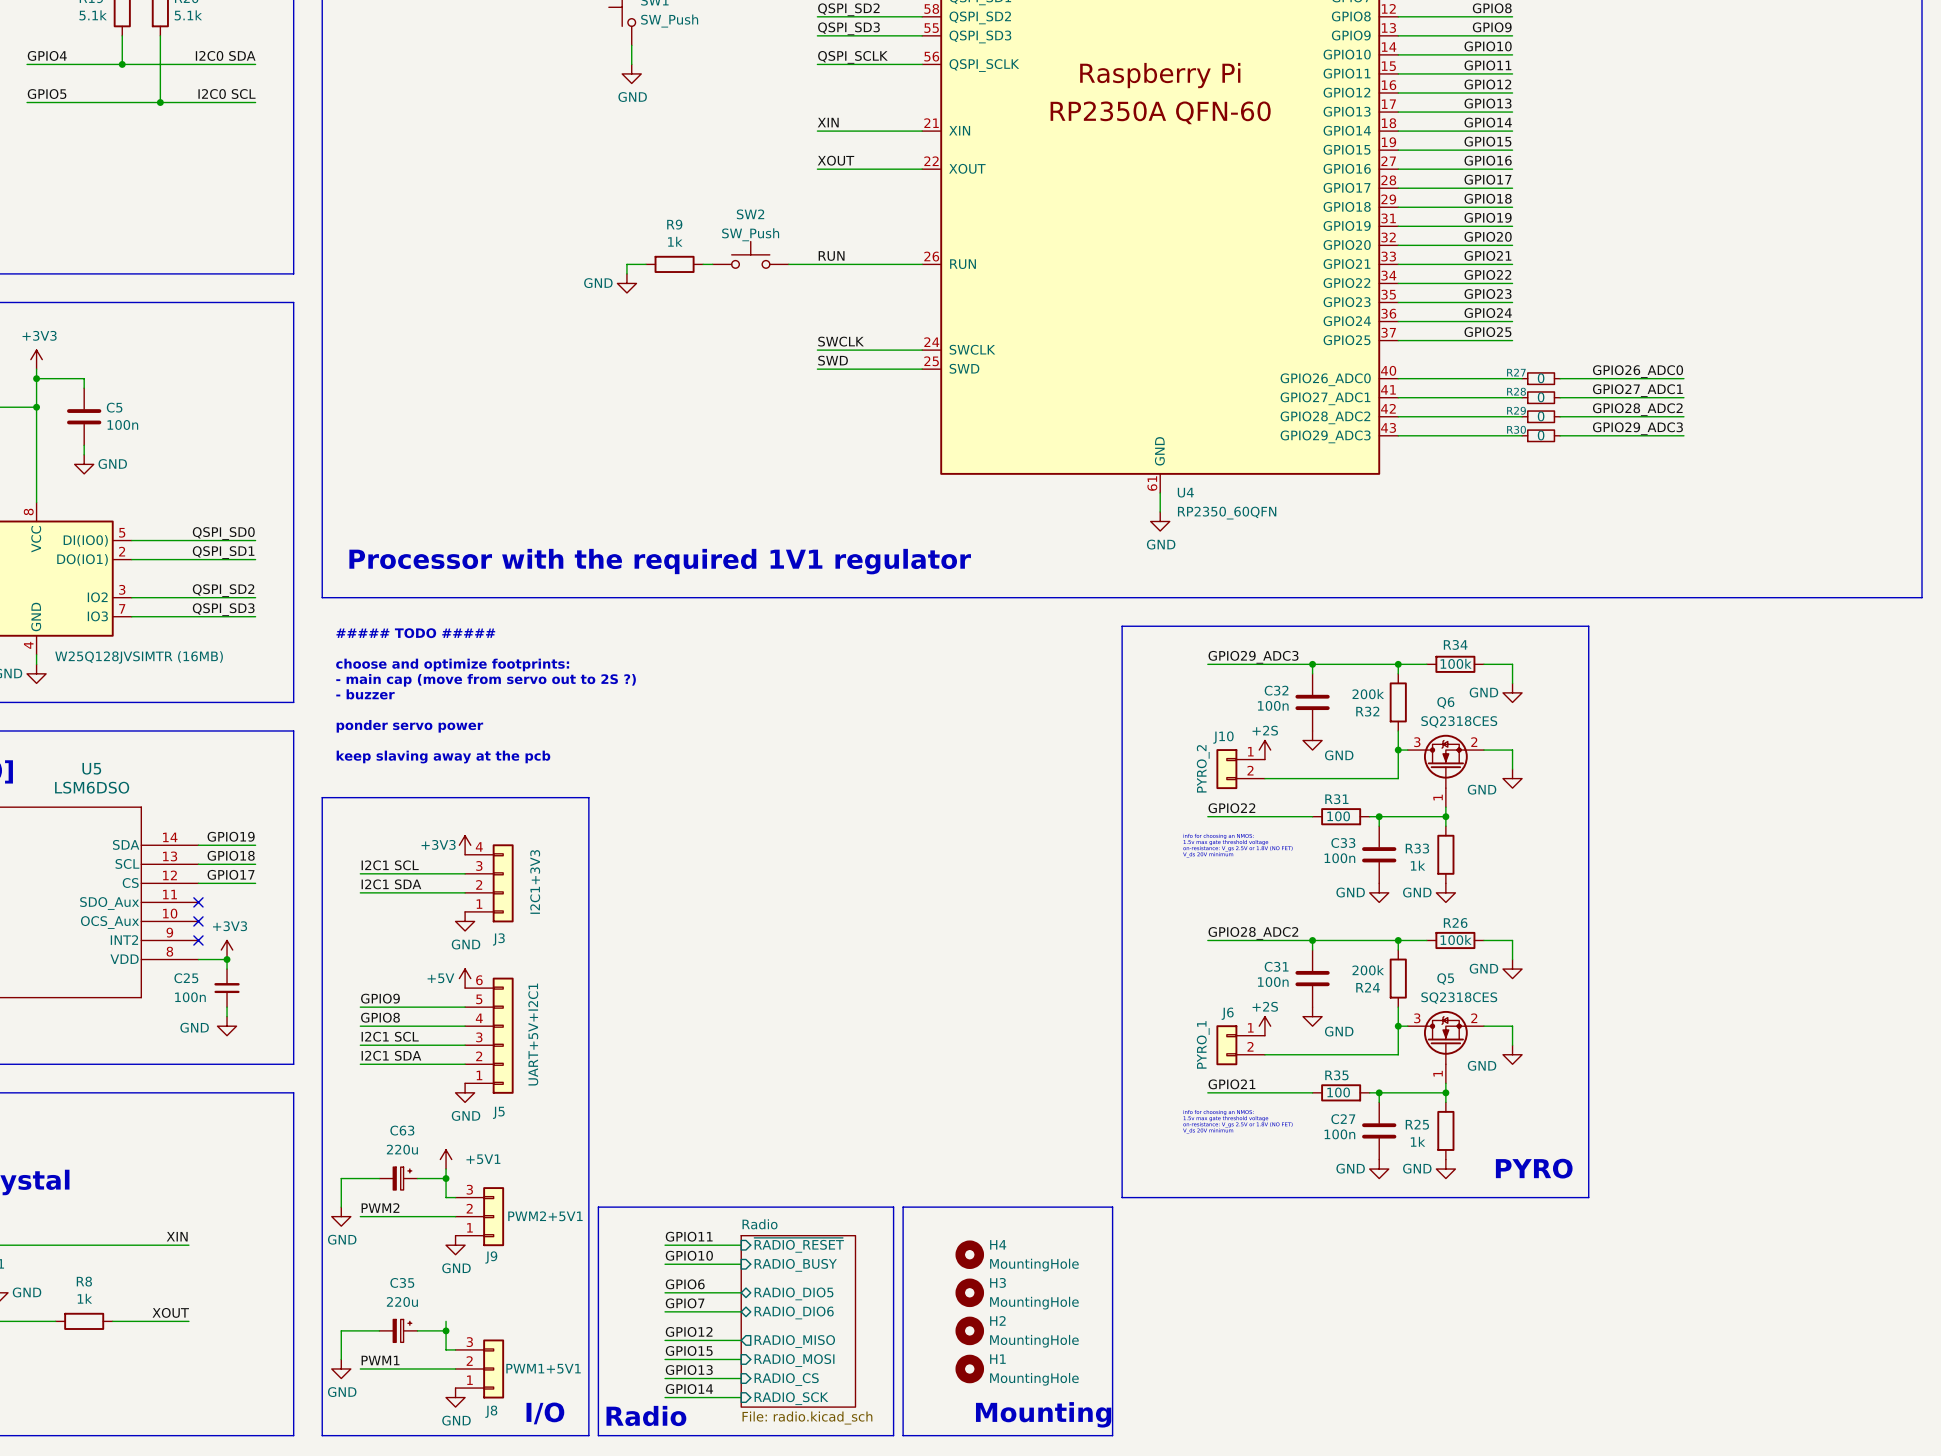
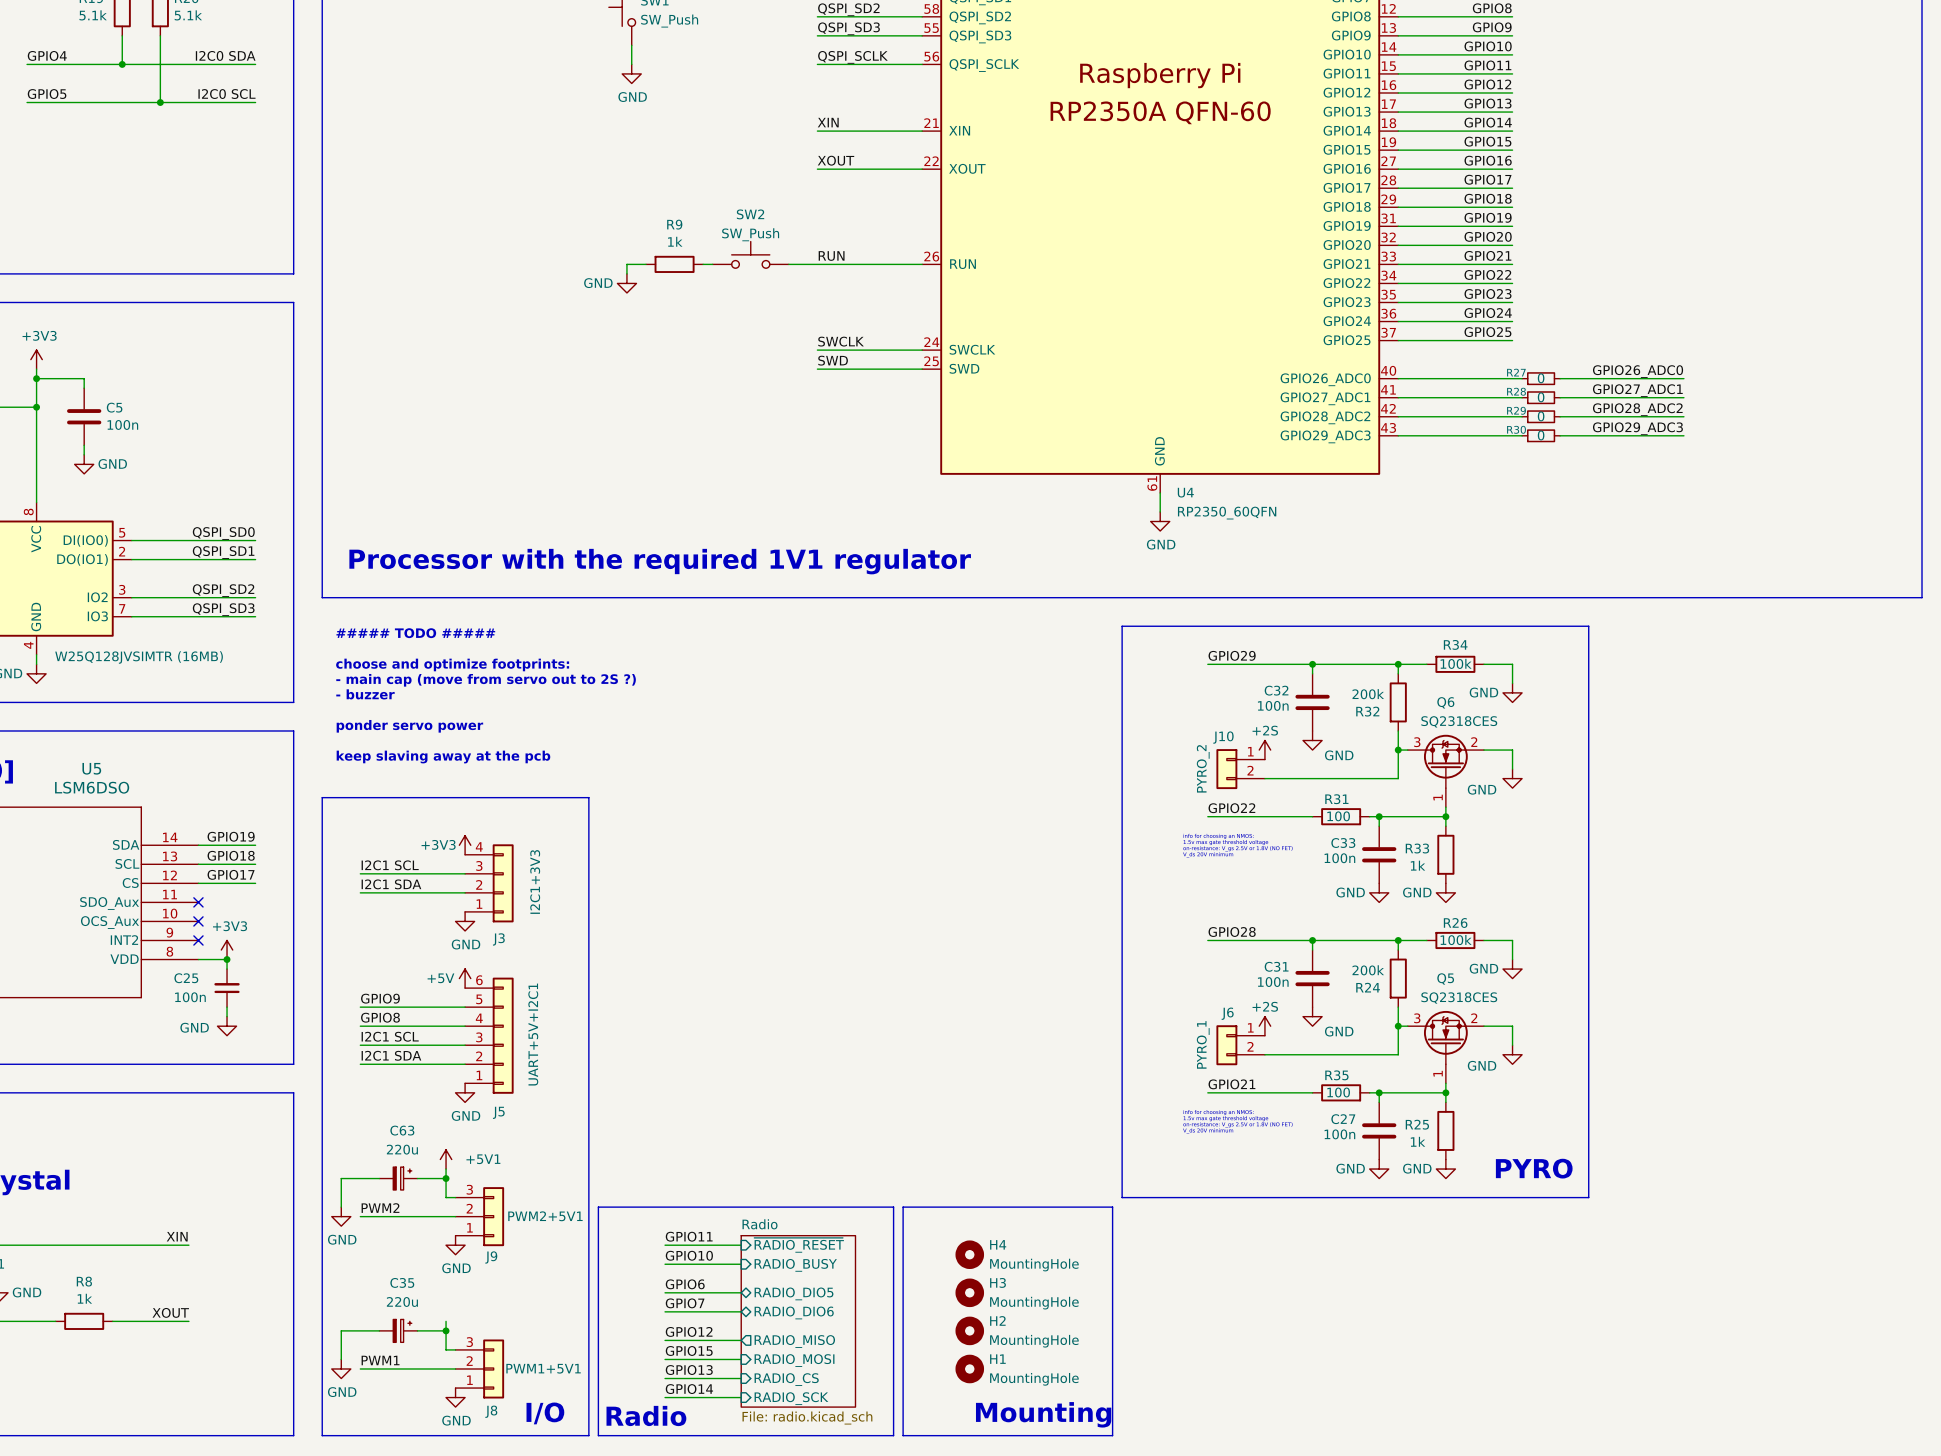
label: GPIO29_ADC3 (1253, 657) -> GPIO29 (1232, 655)
label: GPIO28_ADC2 (1253, 933) -> GPIO28 (1232, 931)

